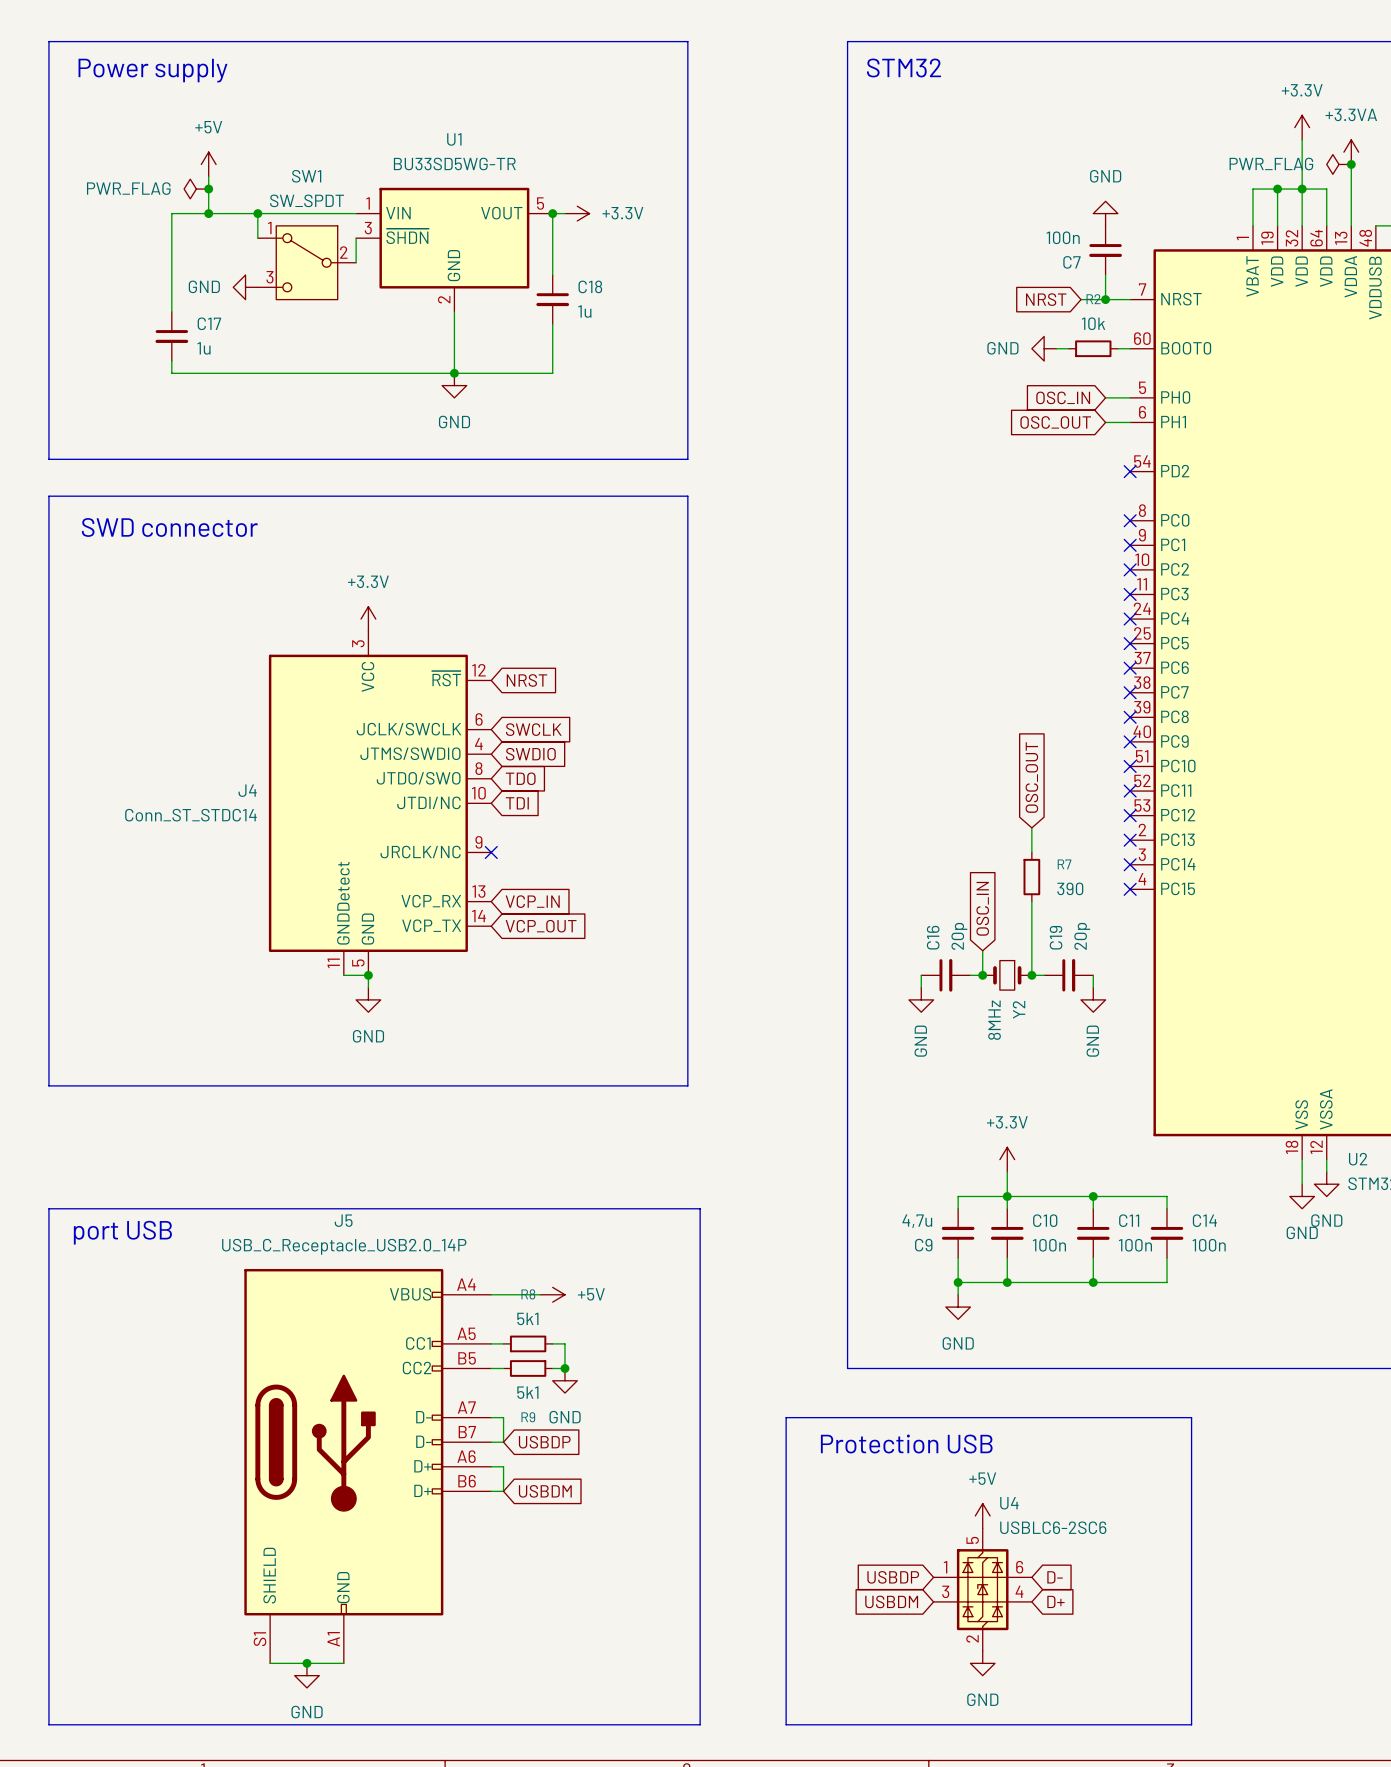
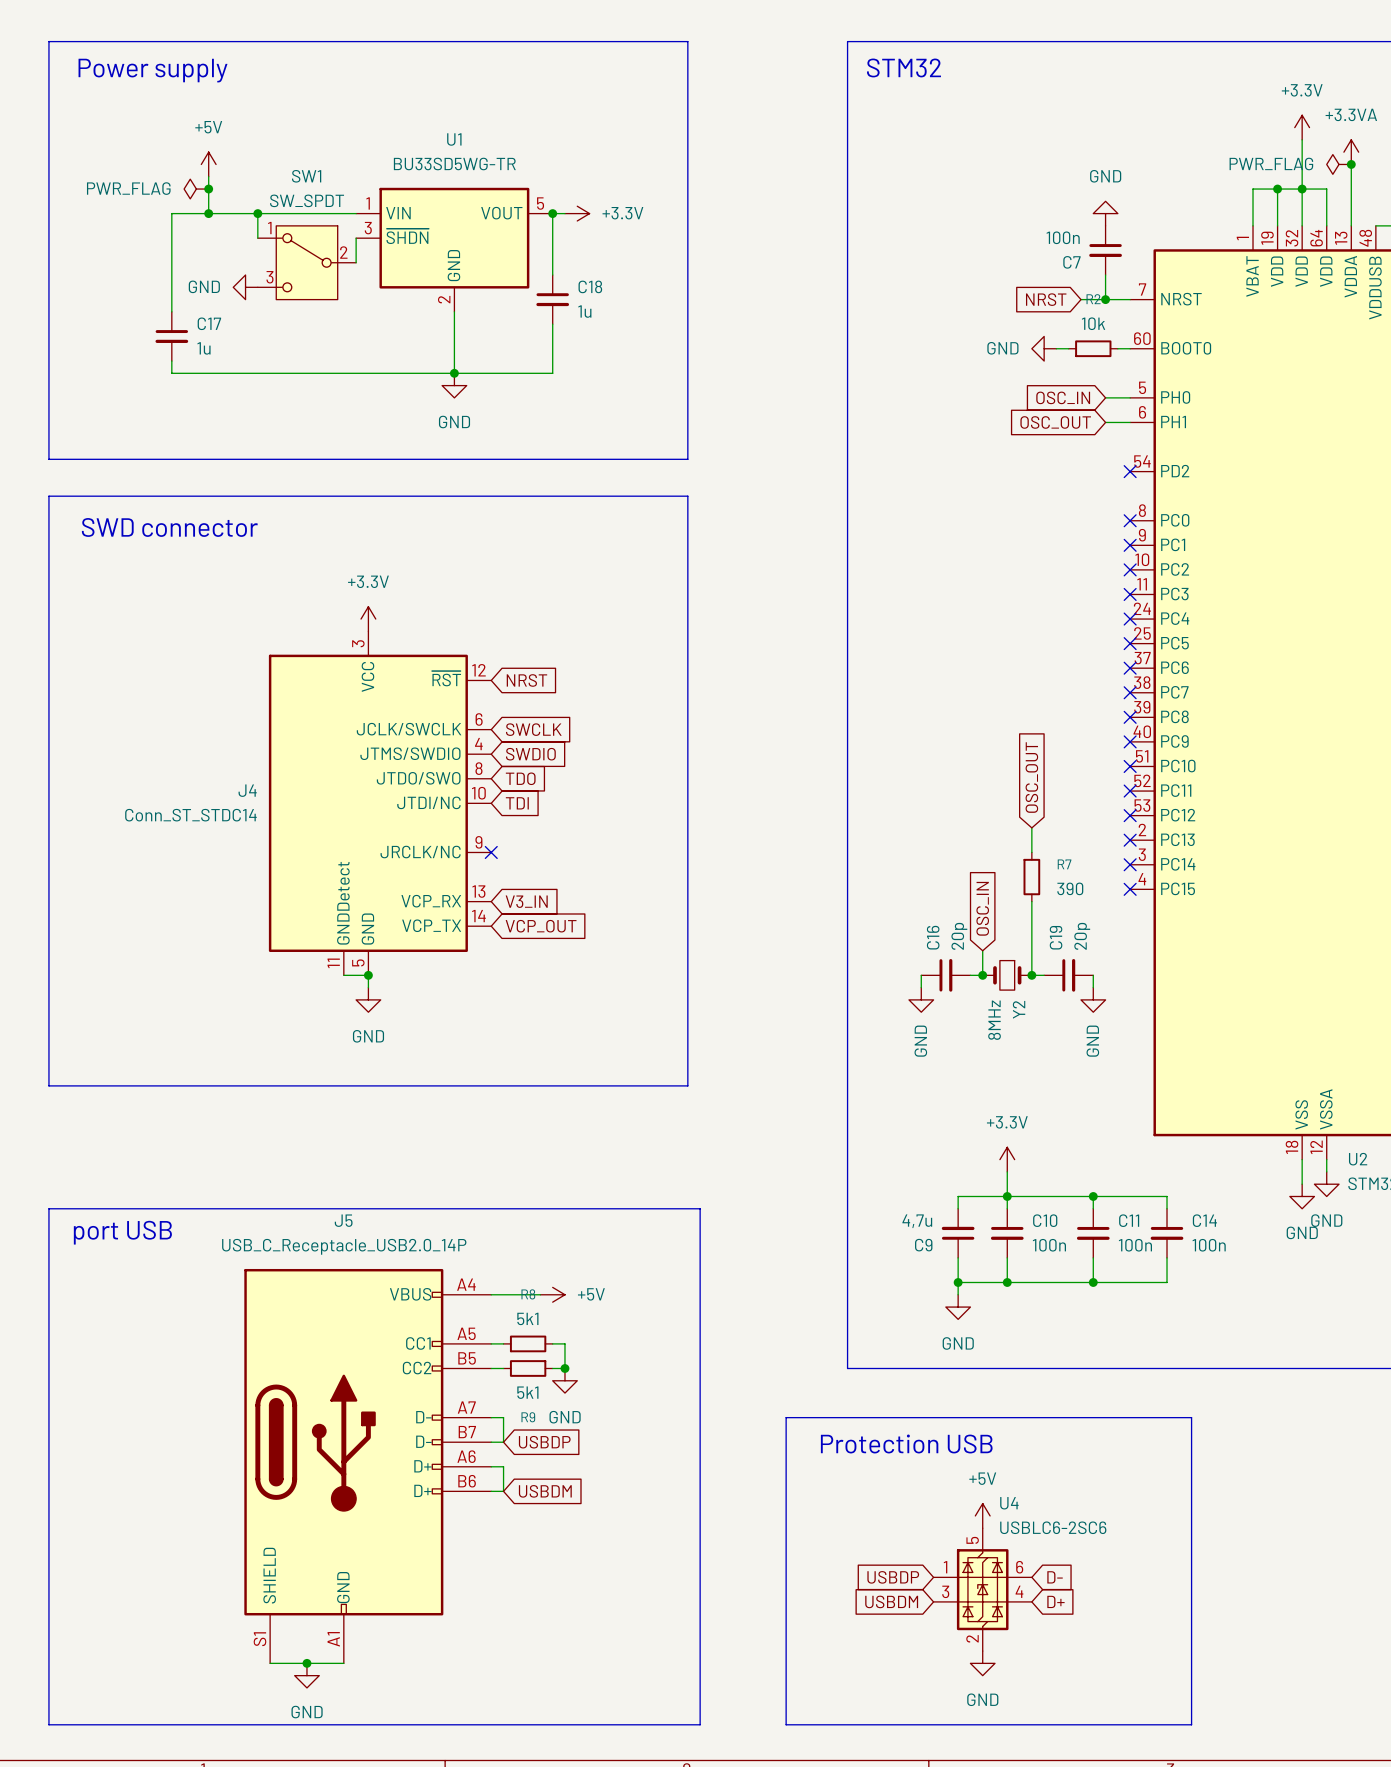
global label: VCP_IN (532, 901) -> V3_IN (526, 901)

